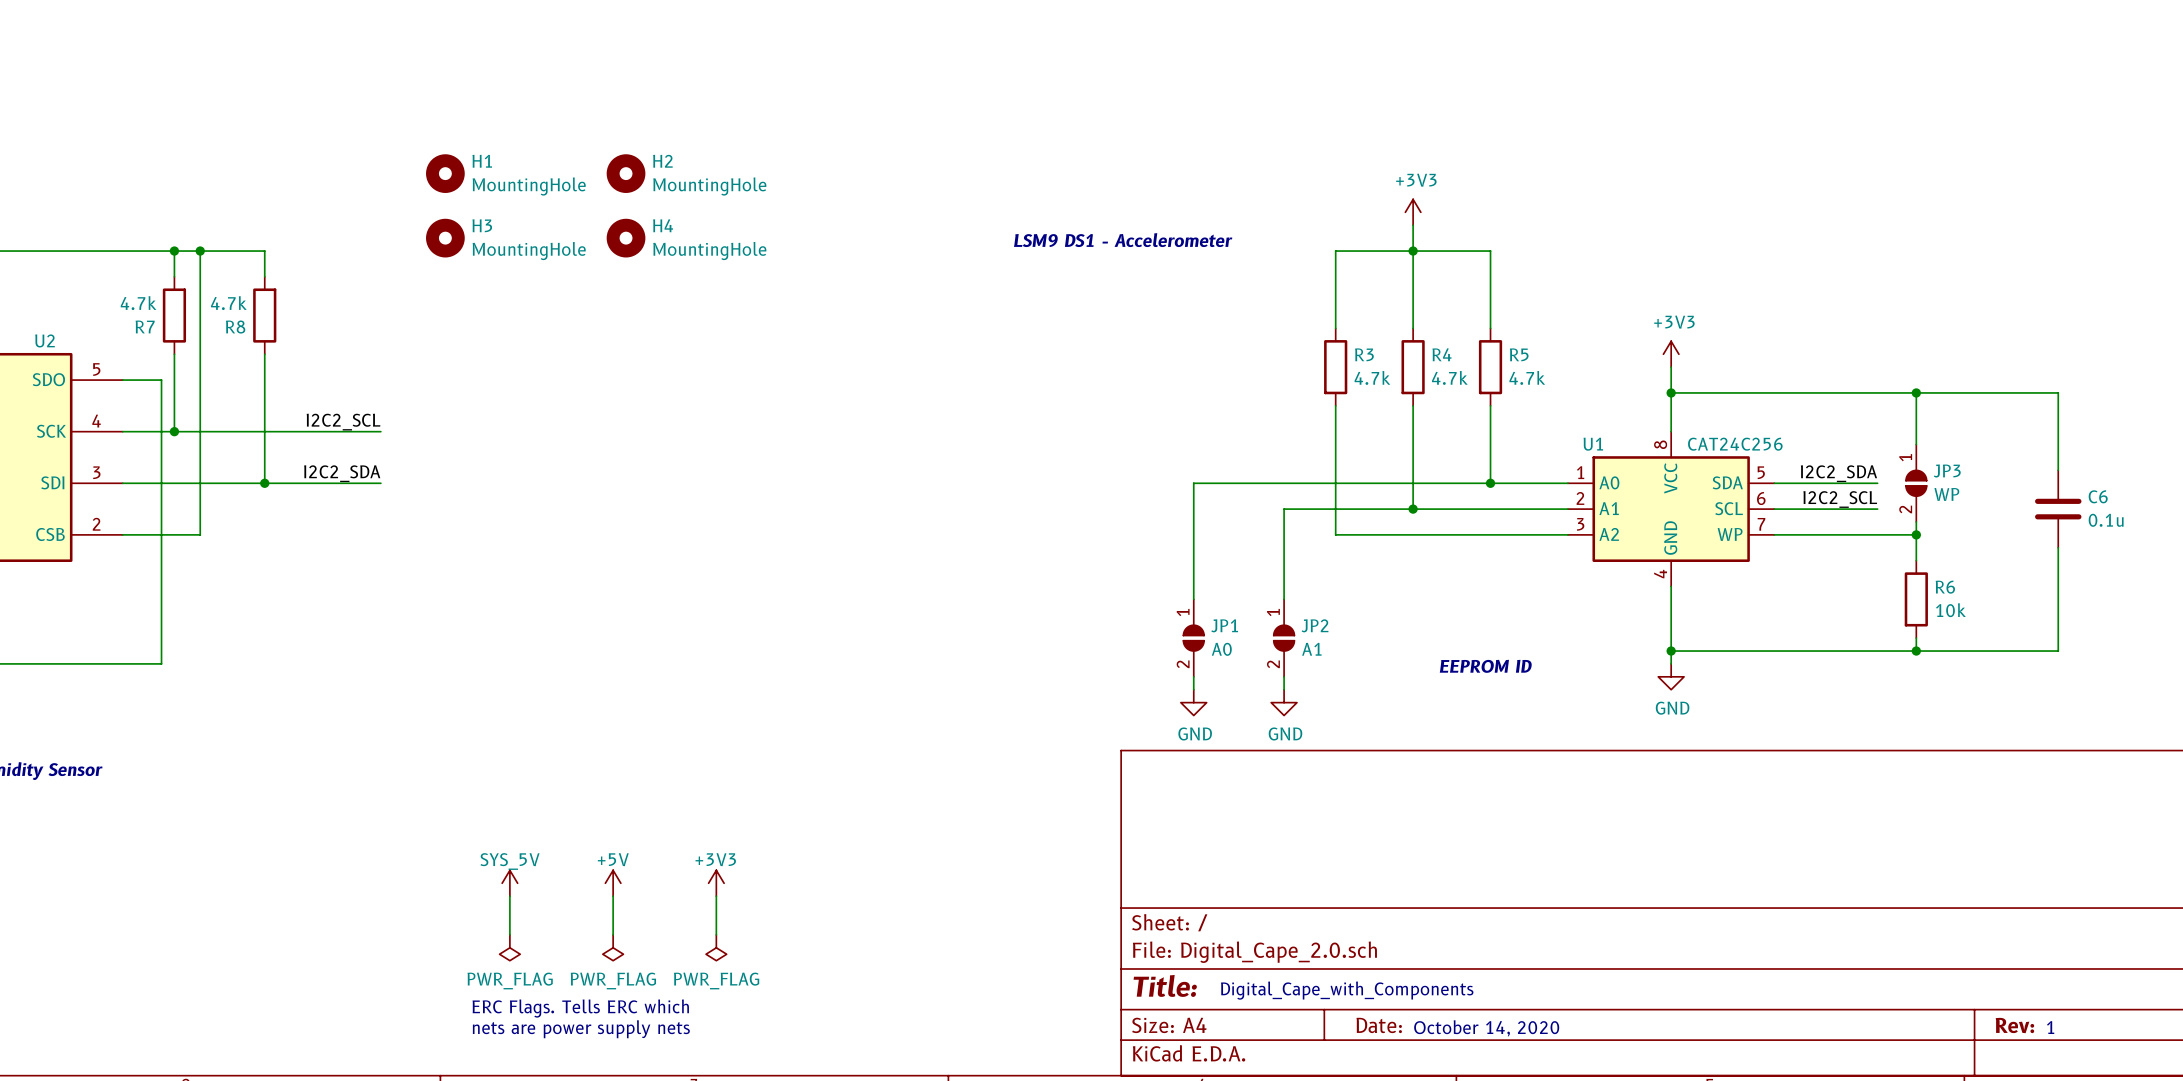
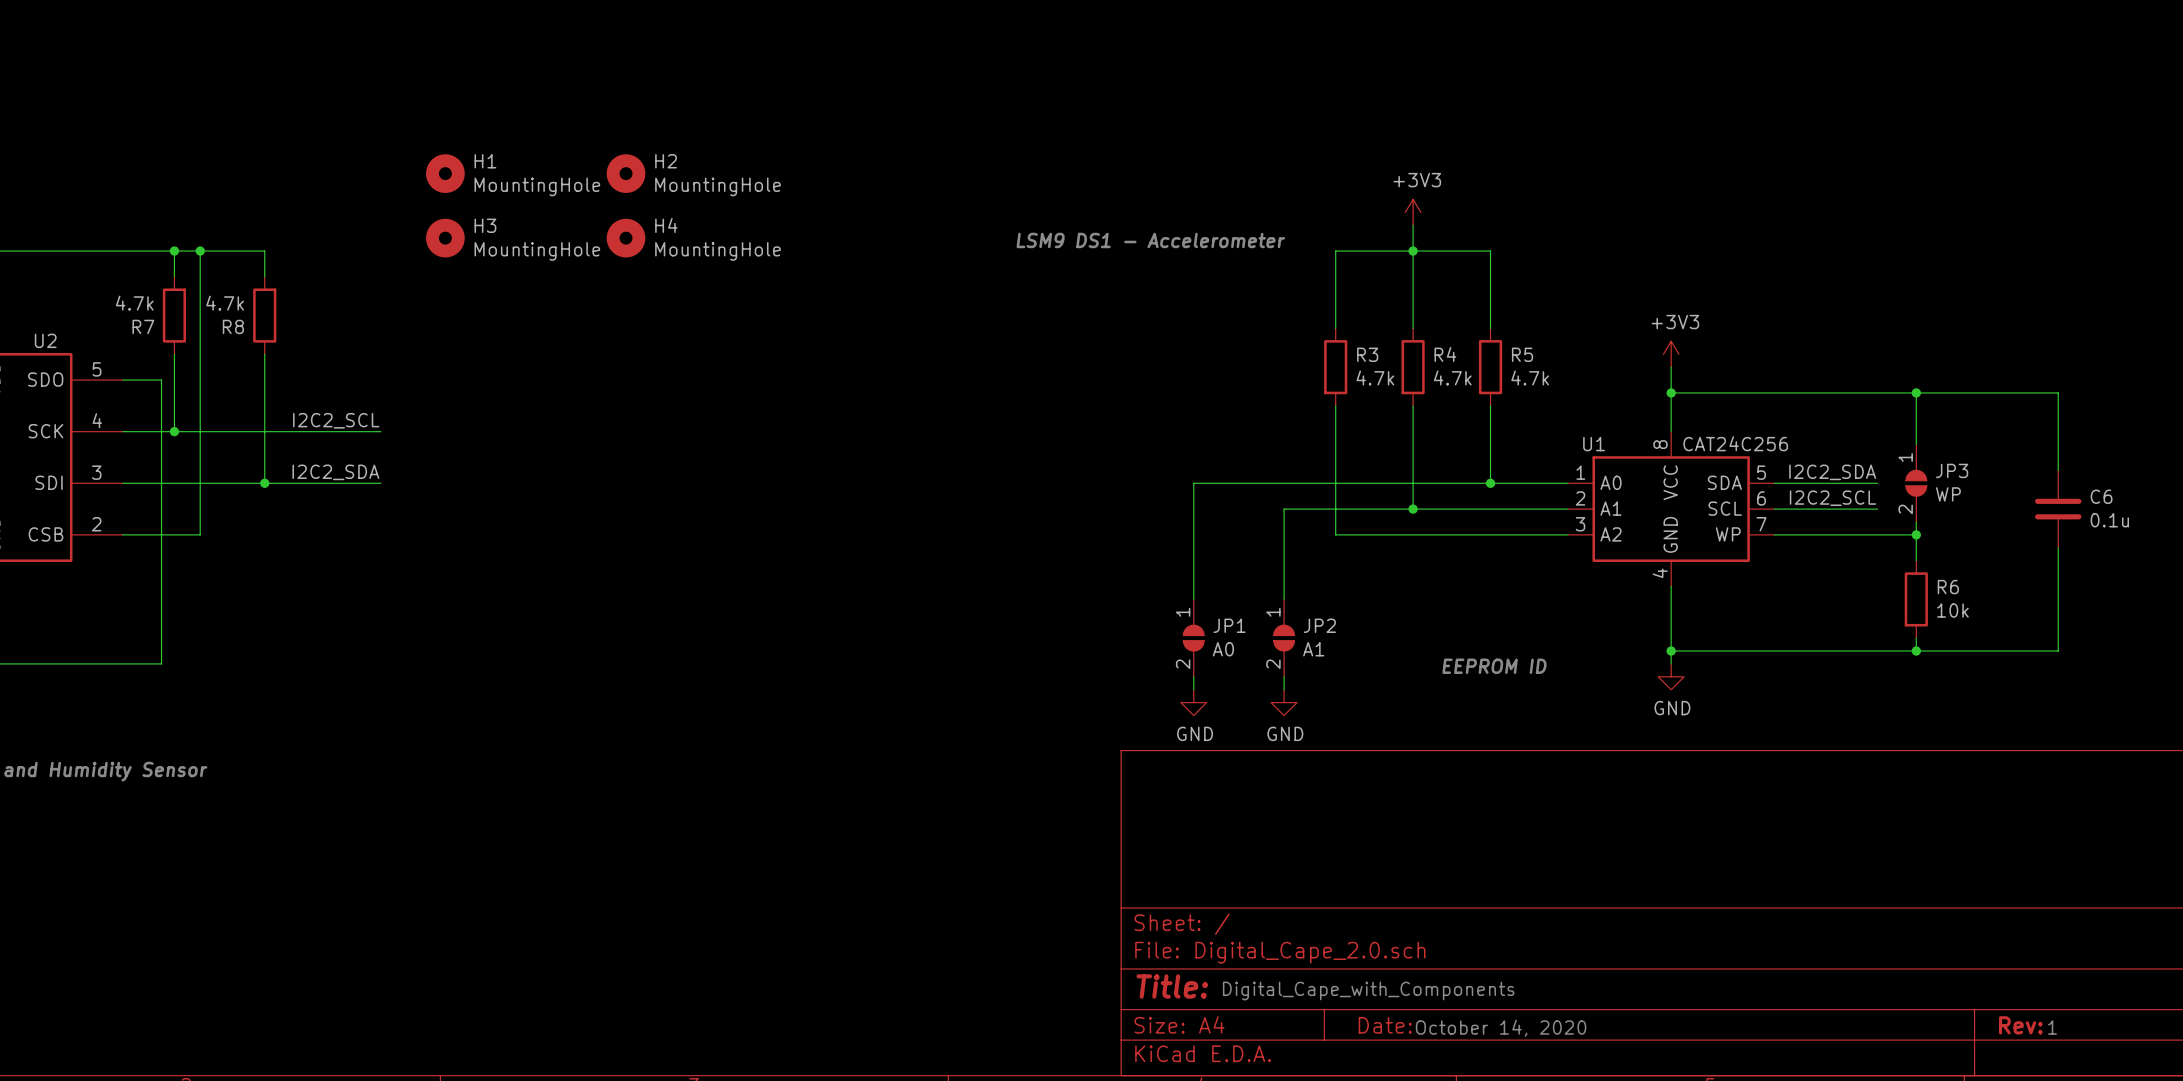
power symbol: SYS_5V (509, 883) -> none
power symbol: +5V (613, 883) -> none
power symbol: +3V3 (716, 883) -> none
wire: (509, 896) (509, 934) -> none
wire: (613, 896) (613, 934) -> none
wire: (716, 896) (716, 934) -> none
power symbol: PWR_FLAG (509, 947) -> none
power symbol: PWR_FLAG (613, 947) -> none
power symbol: PWR_FLAG (716, 947) -> none
text: ERC Flags. Tells ERC which (580, 1008) -> none
text: nets are power supply nets (581, 1029) -> none

